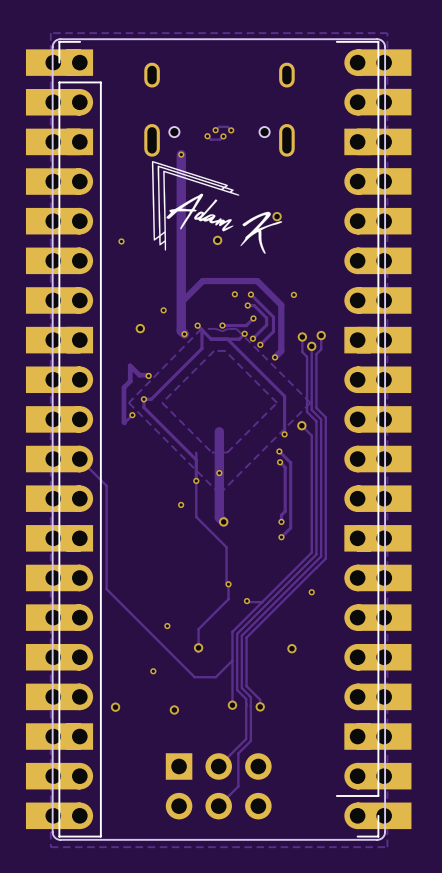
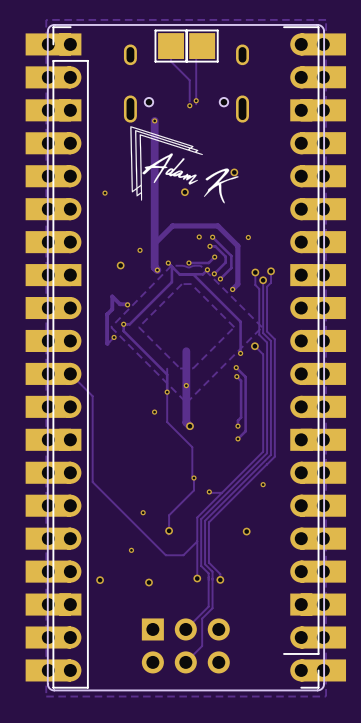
track: none -> (171, 46) (171, 61) (189, 80) (189, 101)
part: none -> (171, 46)
track: none -> (202, 46) (196, 52) (196, 104)
part: none -> (202, 46)
track: (215, 130) (218, 126) (227, 126) (231, 130) -> none
via: (215, 130) -> none
track: (207, 136) (210, 139) (220, 139) (223, 136) -> none
via: (207, 136) -> none

